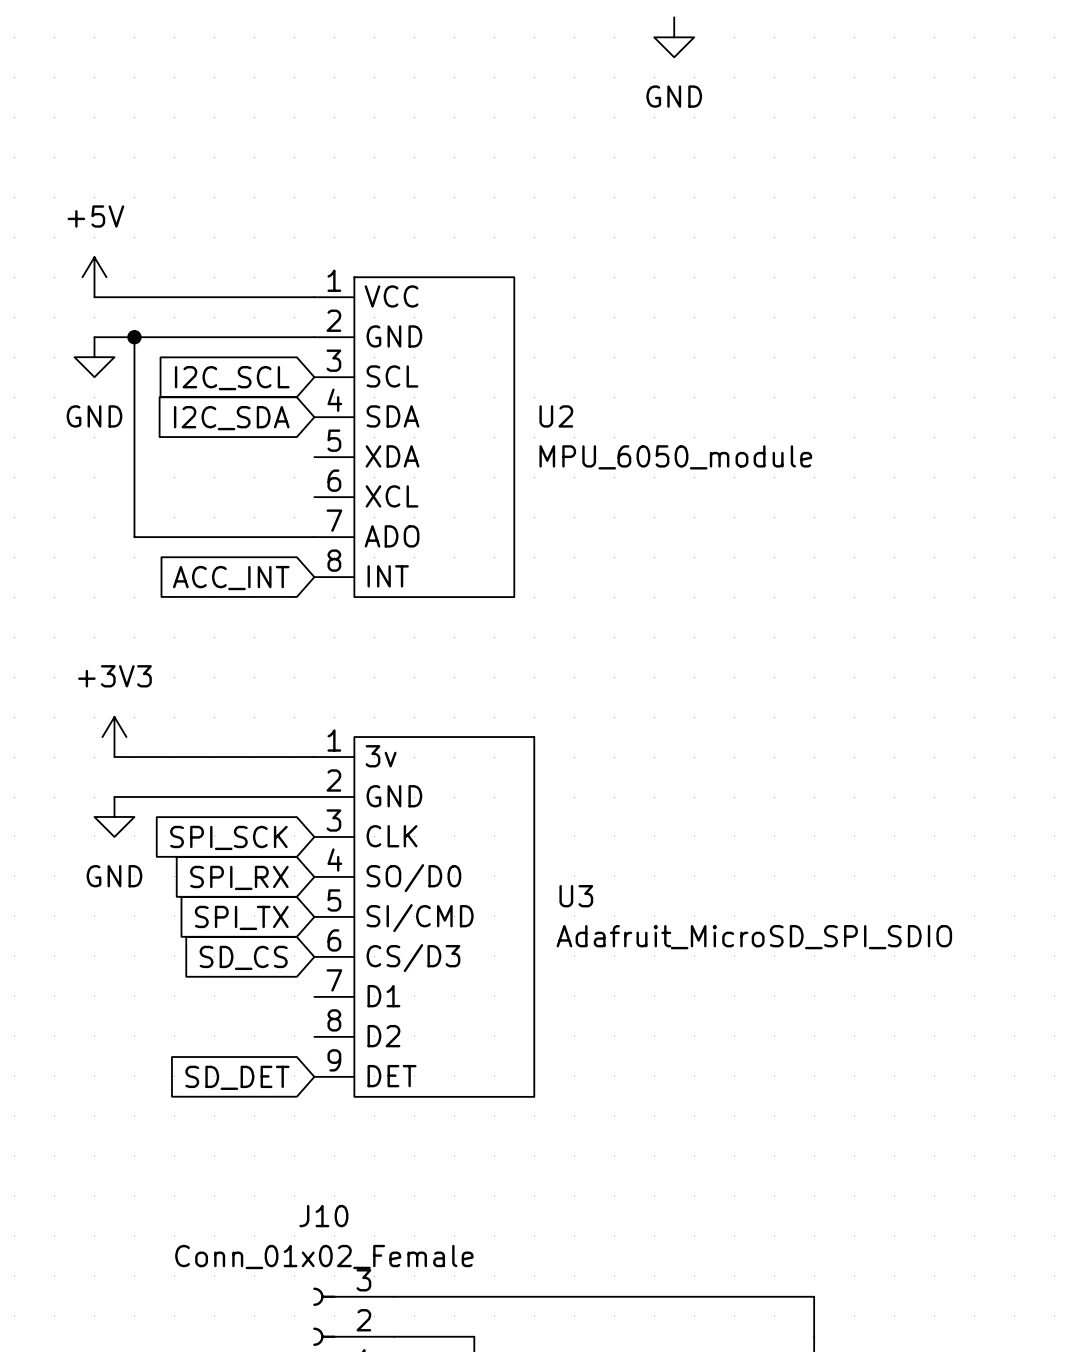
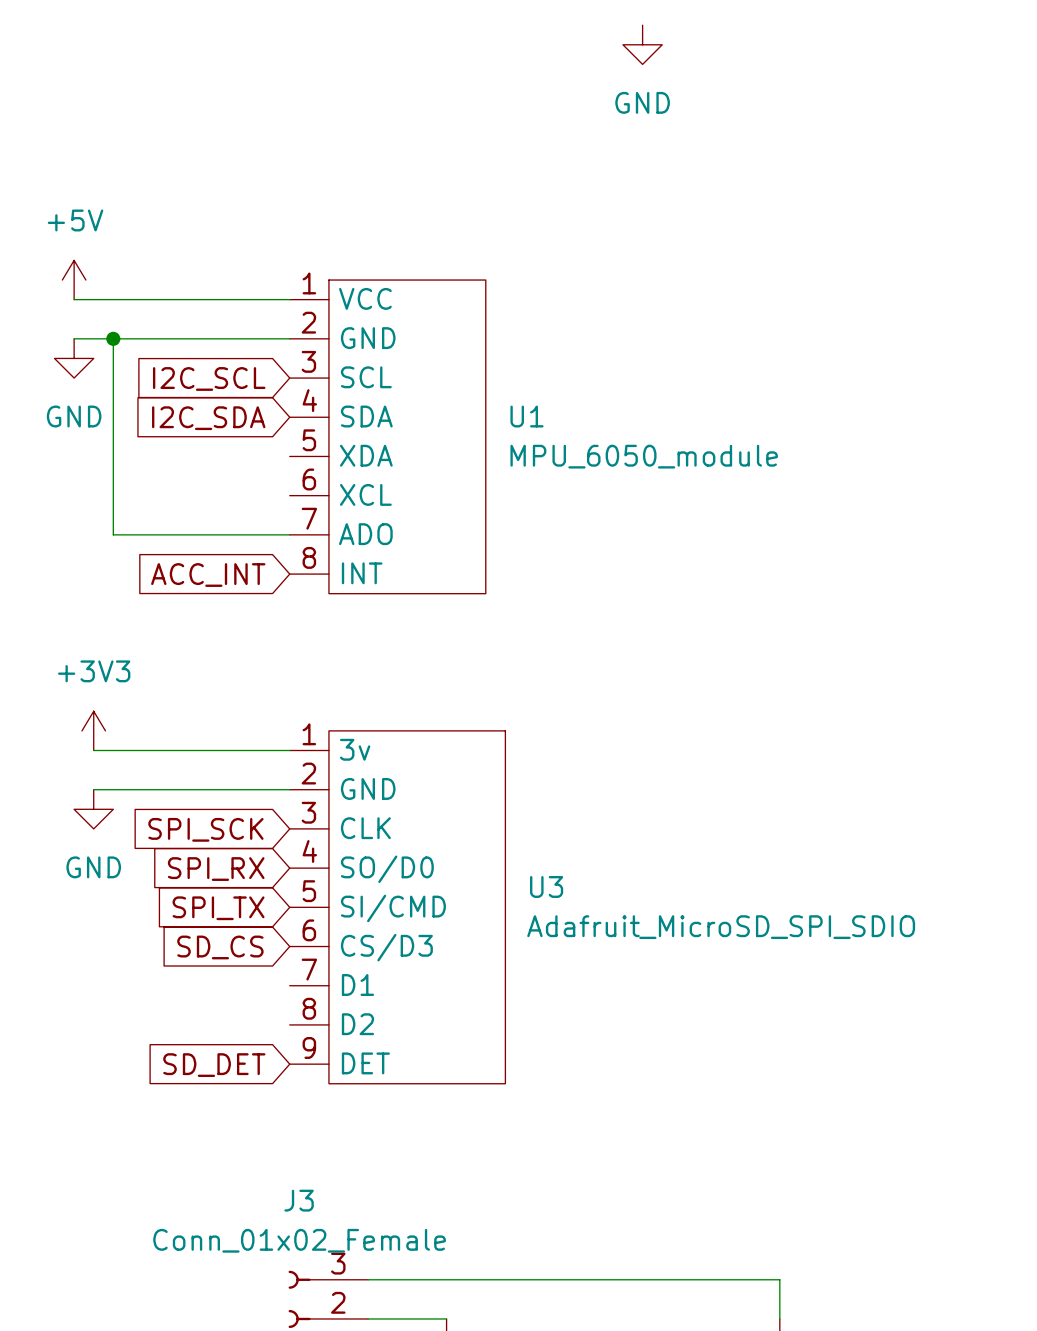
U2 name: U2 (556, 416) -> U1 (527, 416)
J10 name: J10 (323, 1216) -> J3 (299, 1200)

